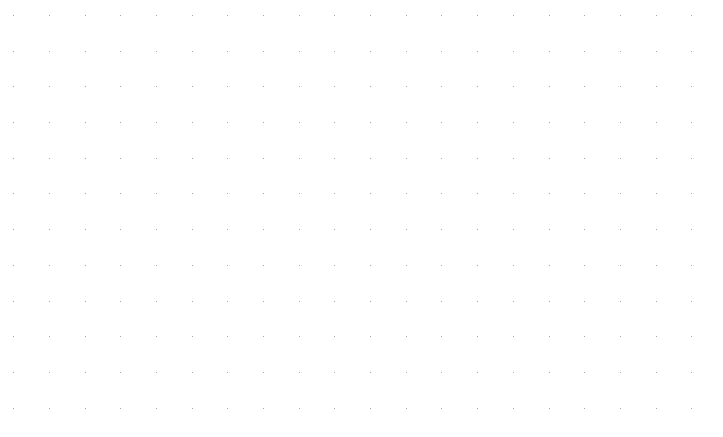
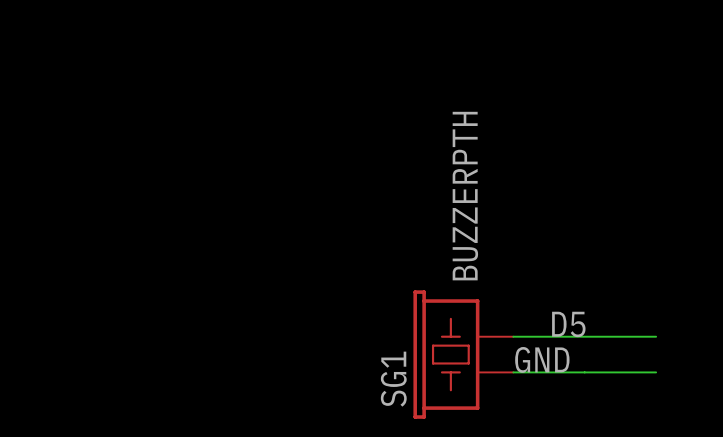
label: none -> D5 (568, 324)
wire: none -> (513, 336) (656, 336)
SG1: none -> BUZZERPTH (463, 354)
label: none -> GND (542, 359)
wire: none -> (513, 372) (656, 372)

